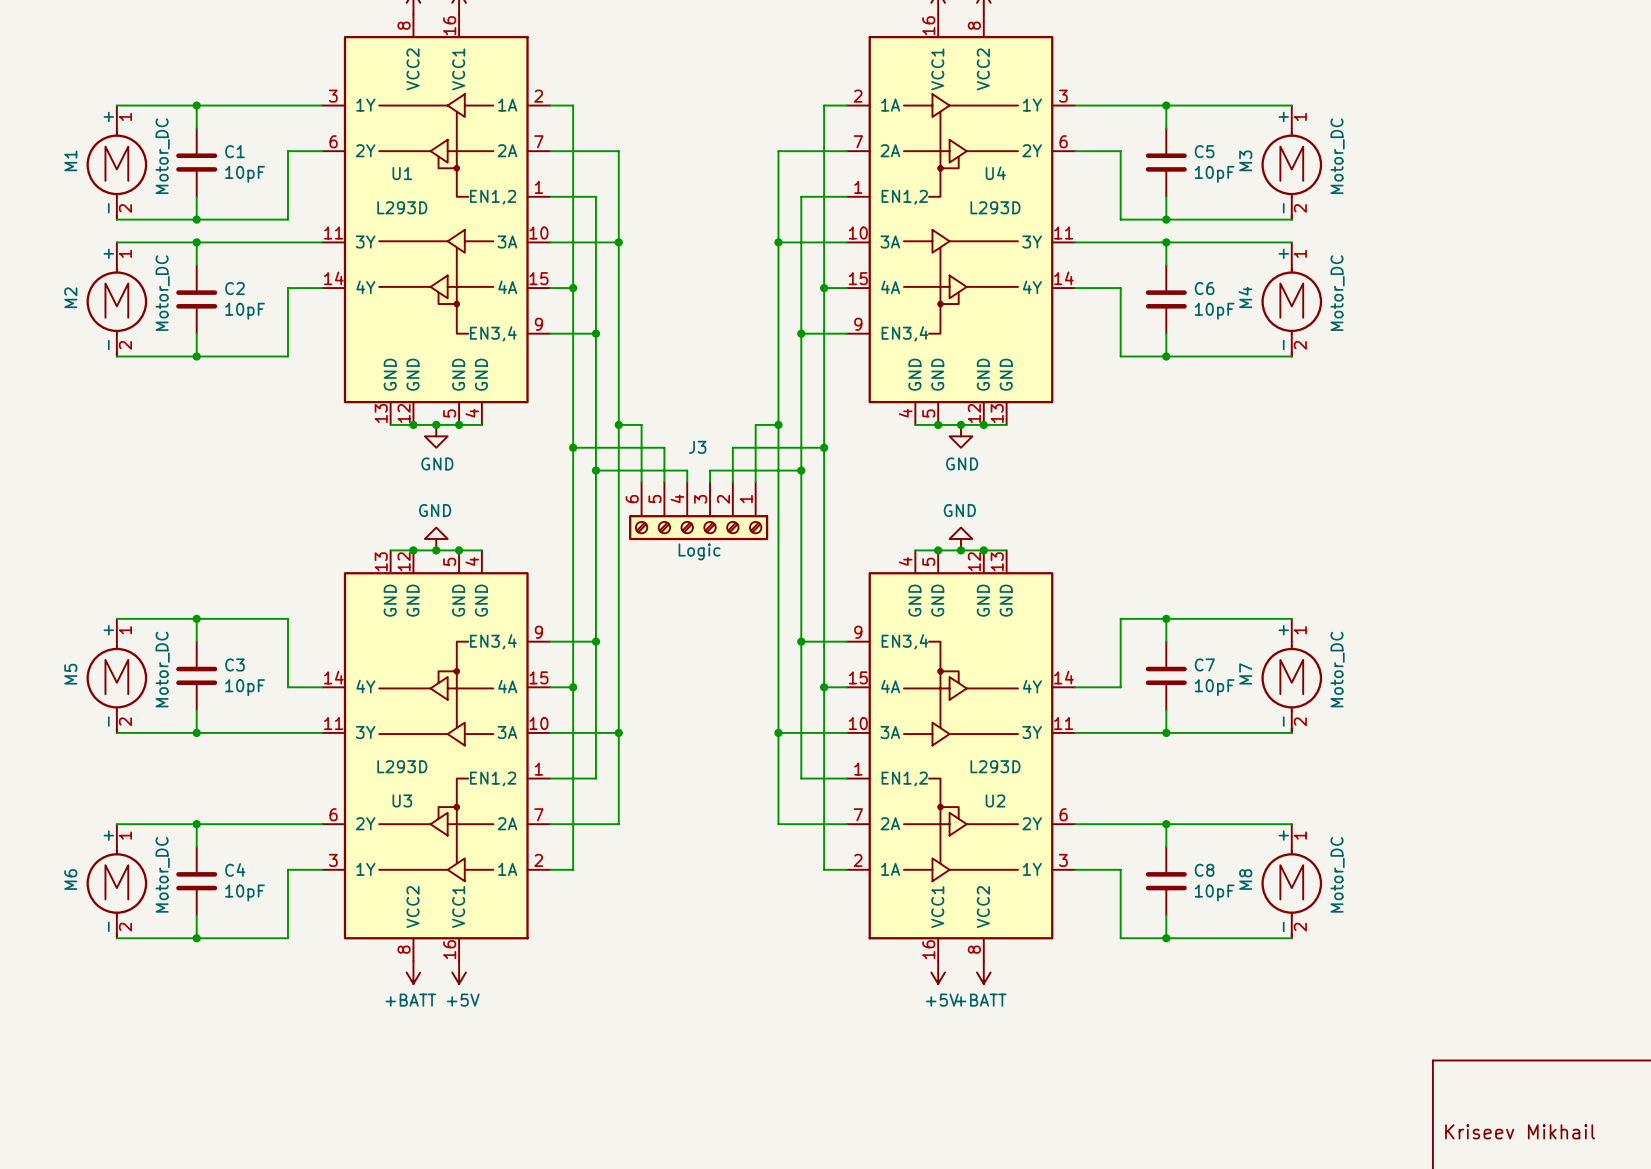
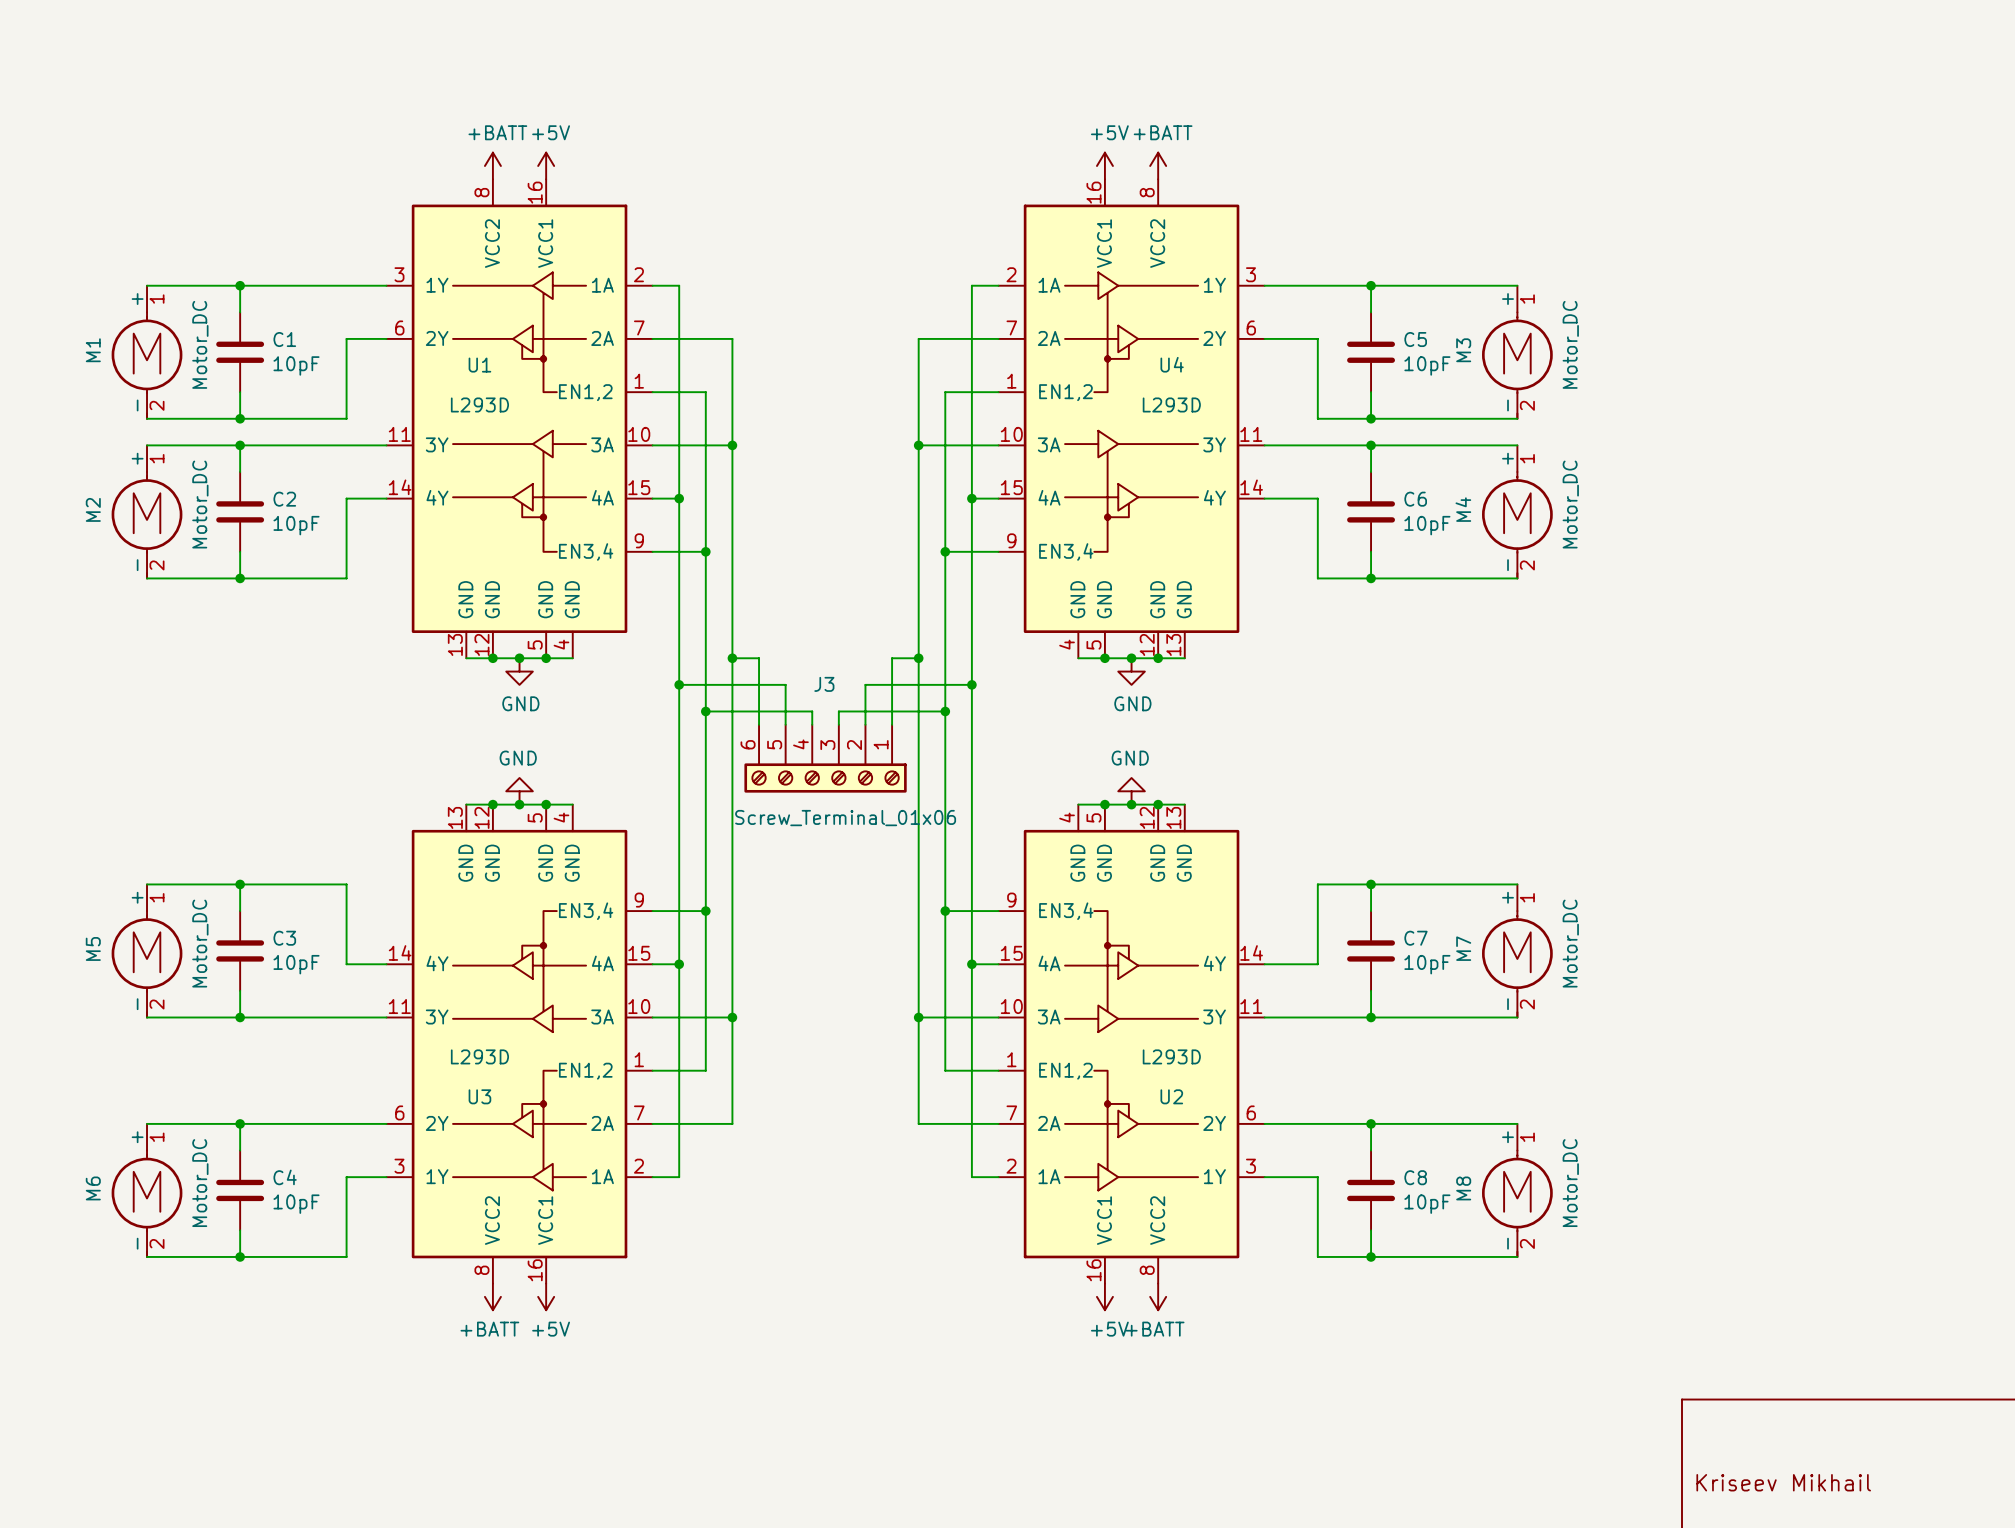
J3 value: Logic (699, 551) -> Screw_Terminal_01x06 (845, 818)

